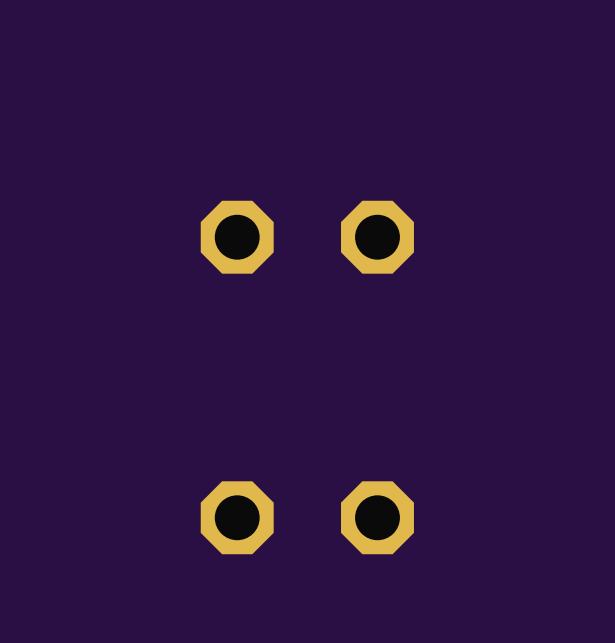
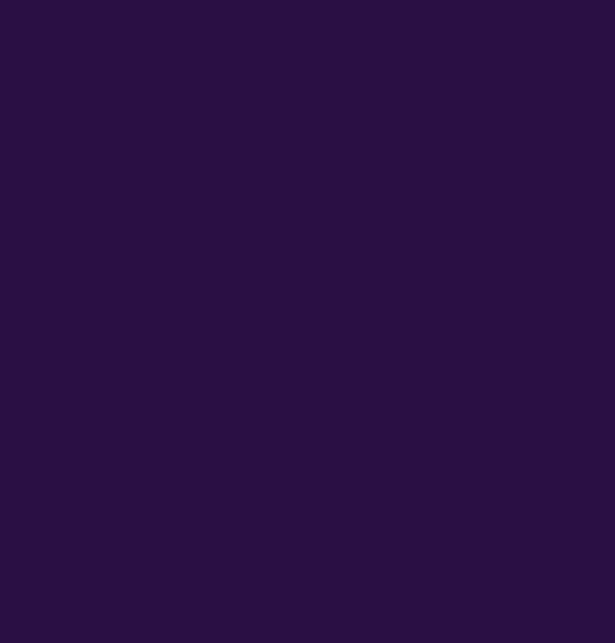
part: (307, 237) -> none
part: (307, 517) -> none

